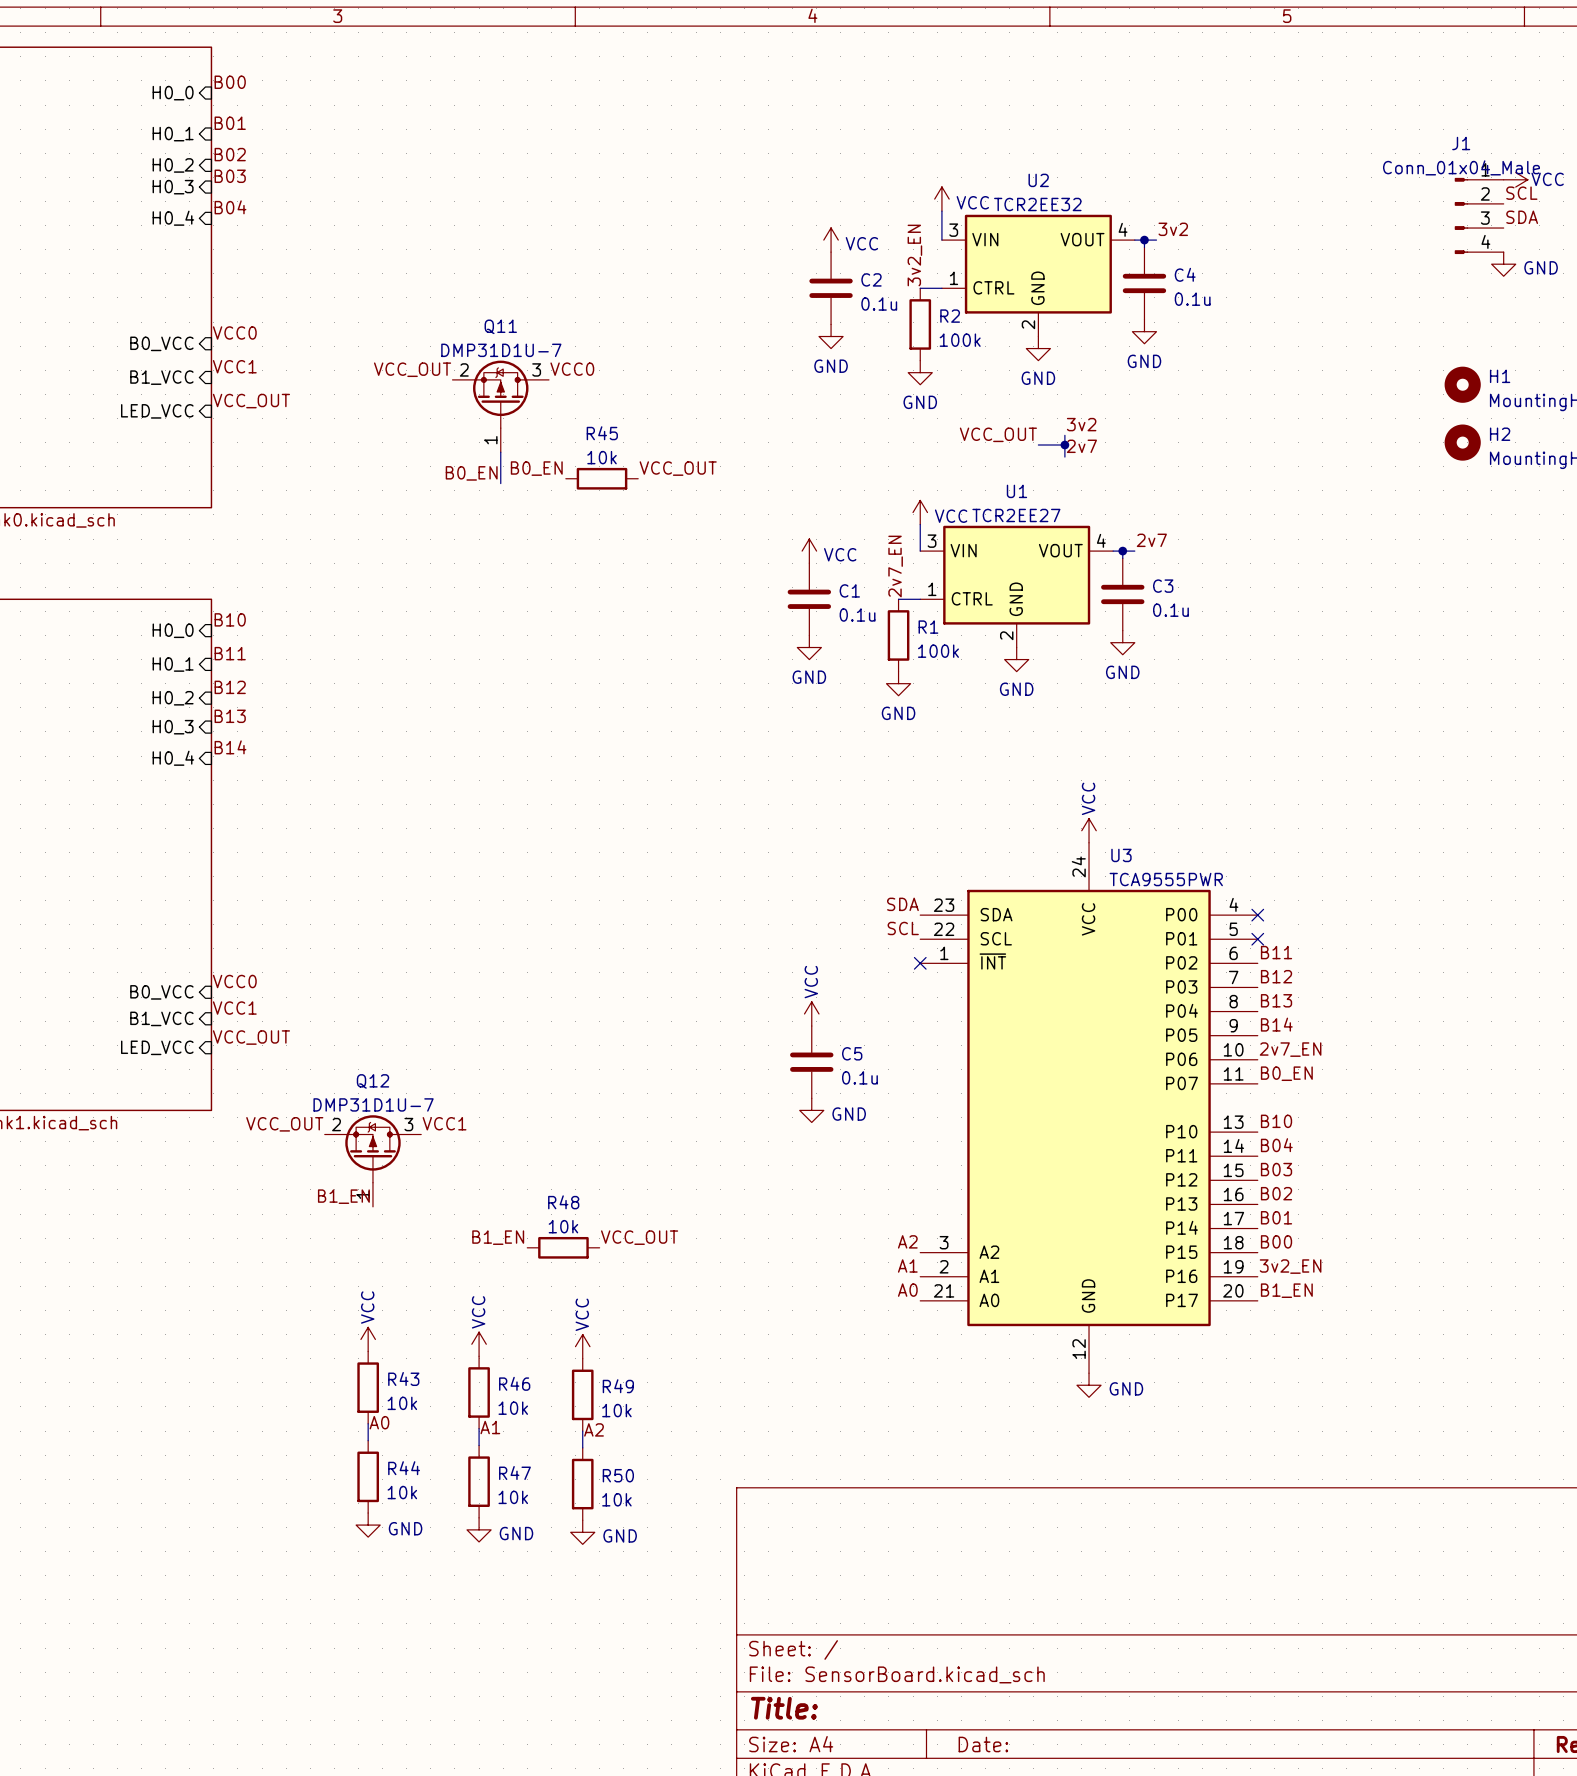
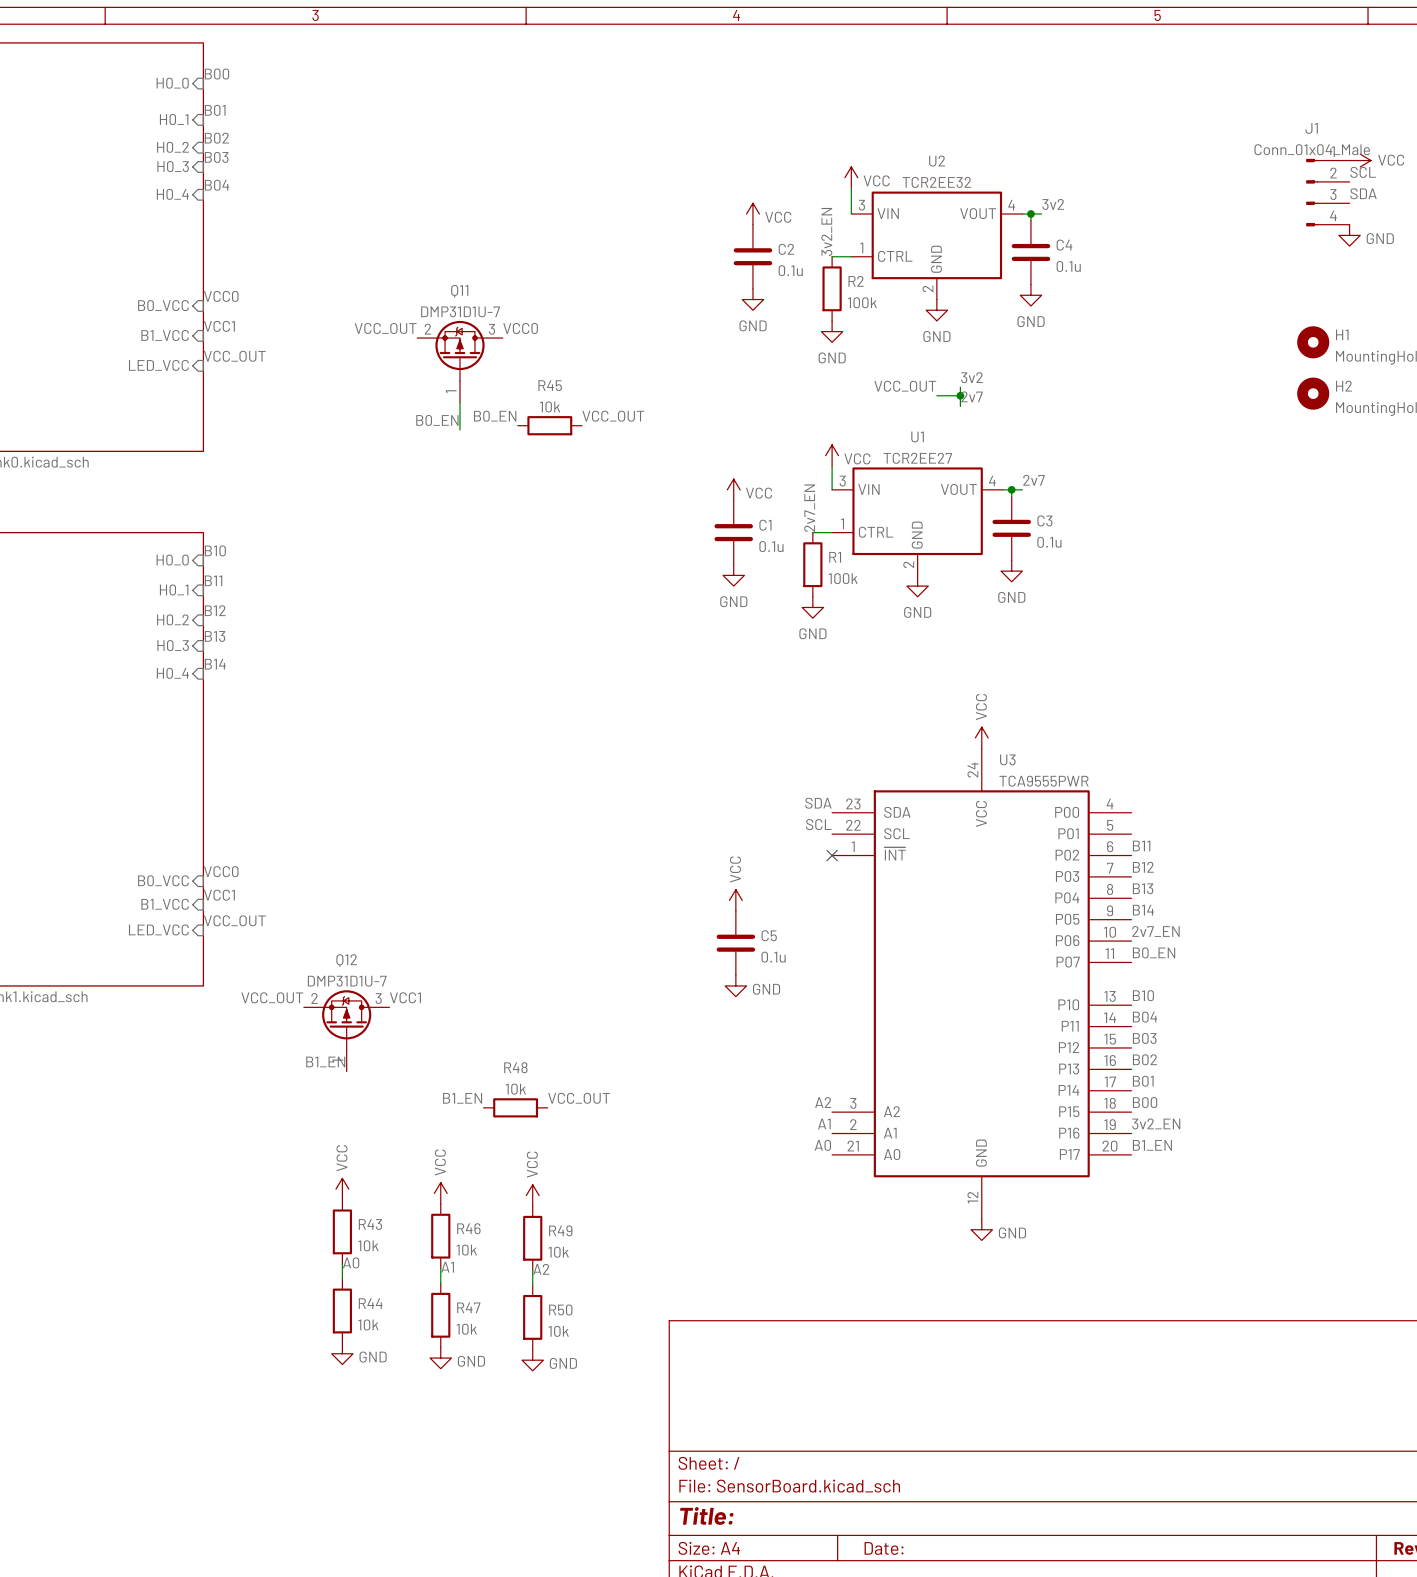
no-connect mark: (1257, 915) -> none
no-connect mark: (1257, 939) -> none

